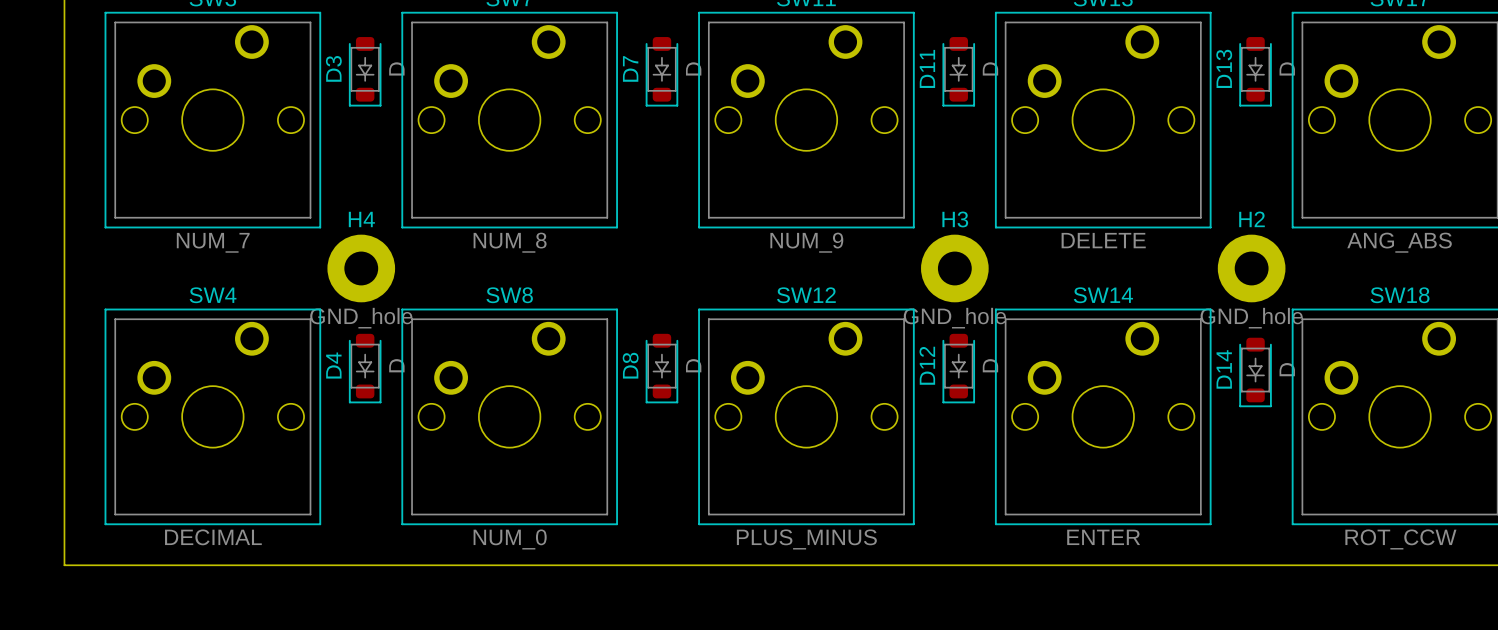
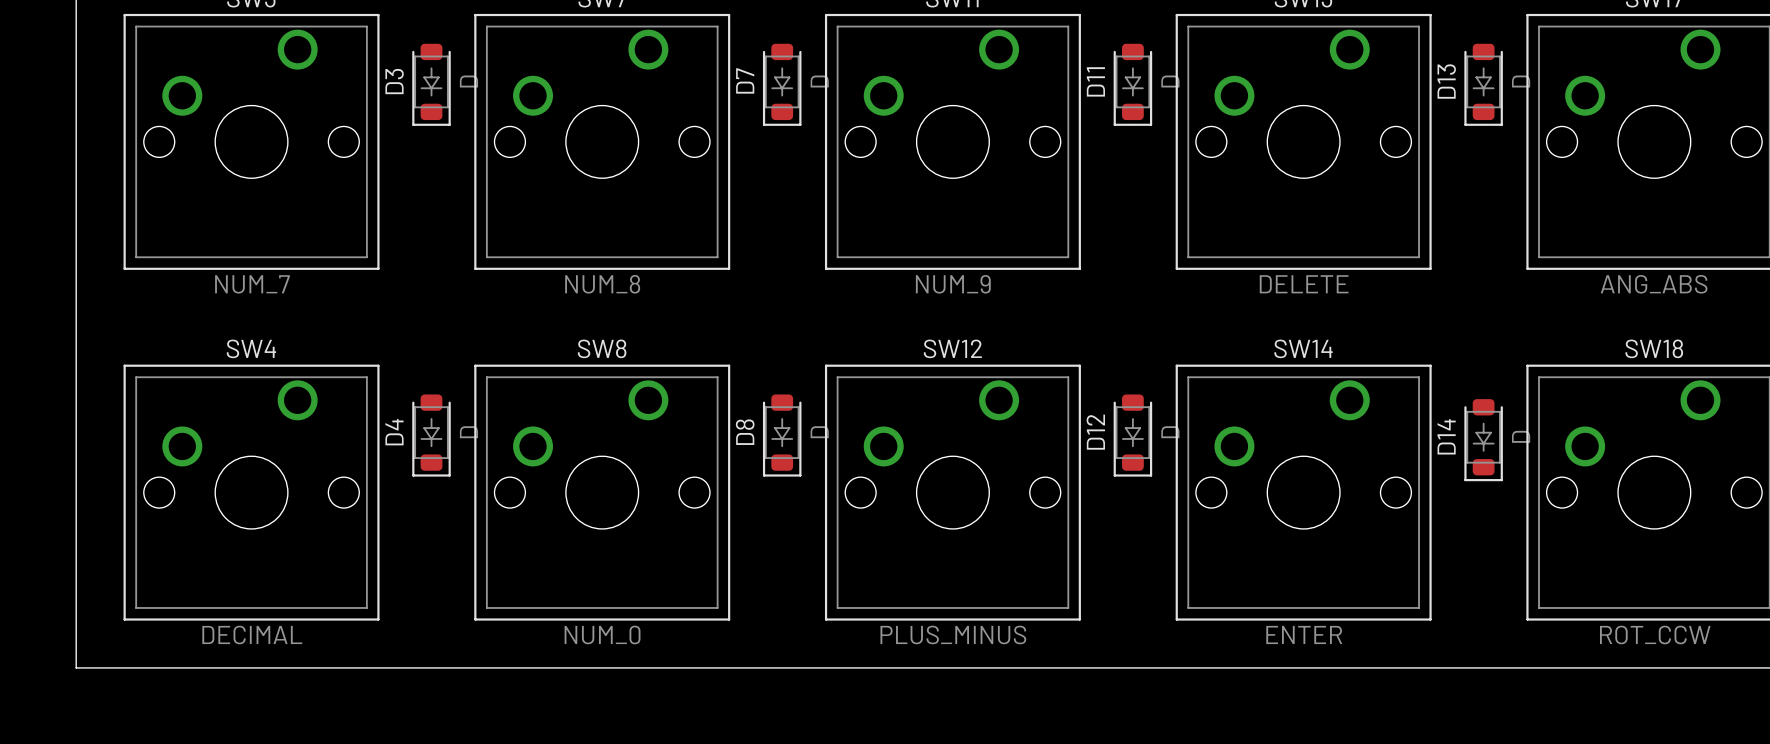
H4: GND_hole (361, 268) -> none
H3: GND_hole (954, 268) -> none
H2: GND_hole (1251, 268) -> none

